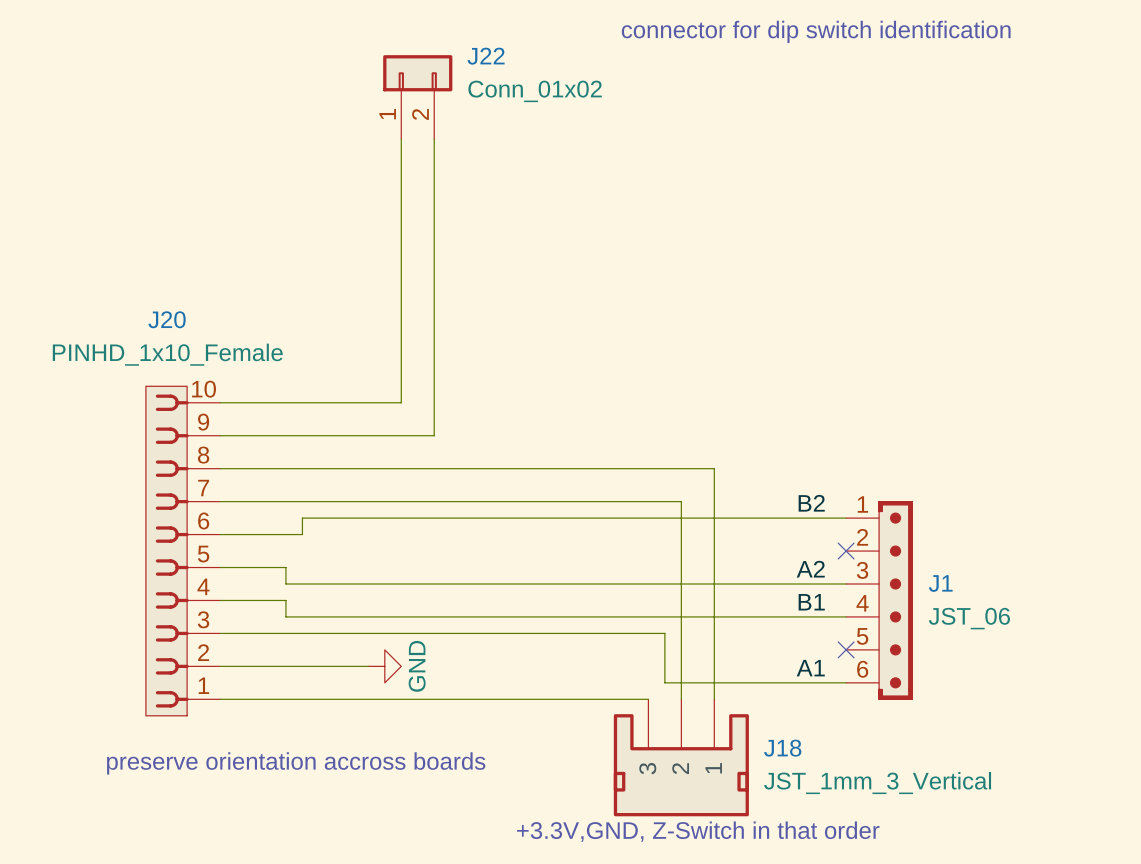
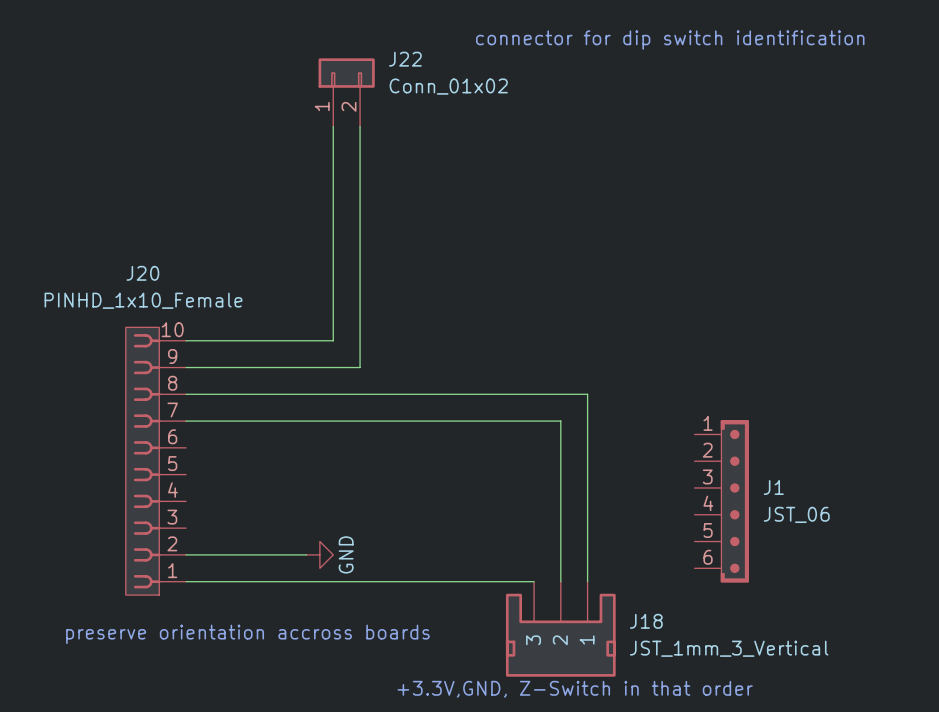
label: B2 (811, 503) -> none
wire: (846, 518) (302, 518) (302, 534) (220, 534) -> none
no-connect mark: (846, 551) -> none
wire: (220, 567) (285, 567) (285, 583) (846, 583) -> none
label: A2 (810, 569) -> none
wire: (220, 600) (285, 600) (285, 616) (846, 616) -> none
label: B1 (811, 602) -> none
wire: (220, 633) (664, 633) (664, 682) (846, 682) -> none
no-connect mark: (846, 649) -> none
label: A1 (810, 668) -> none

